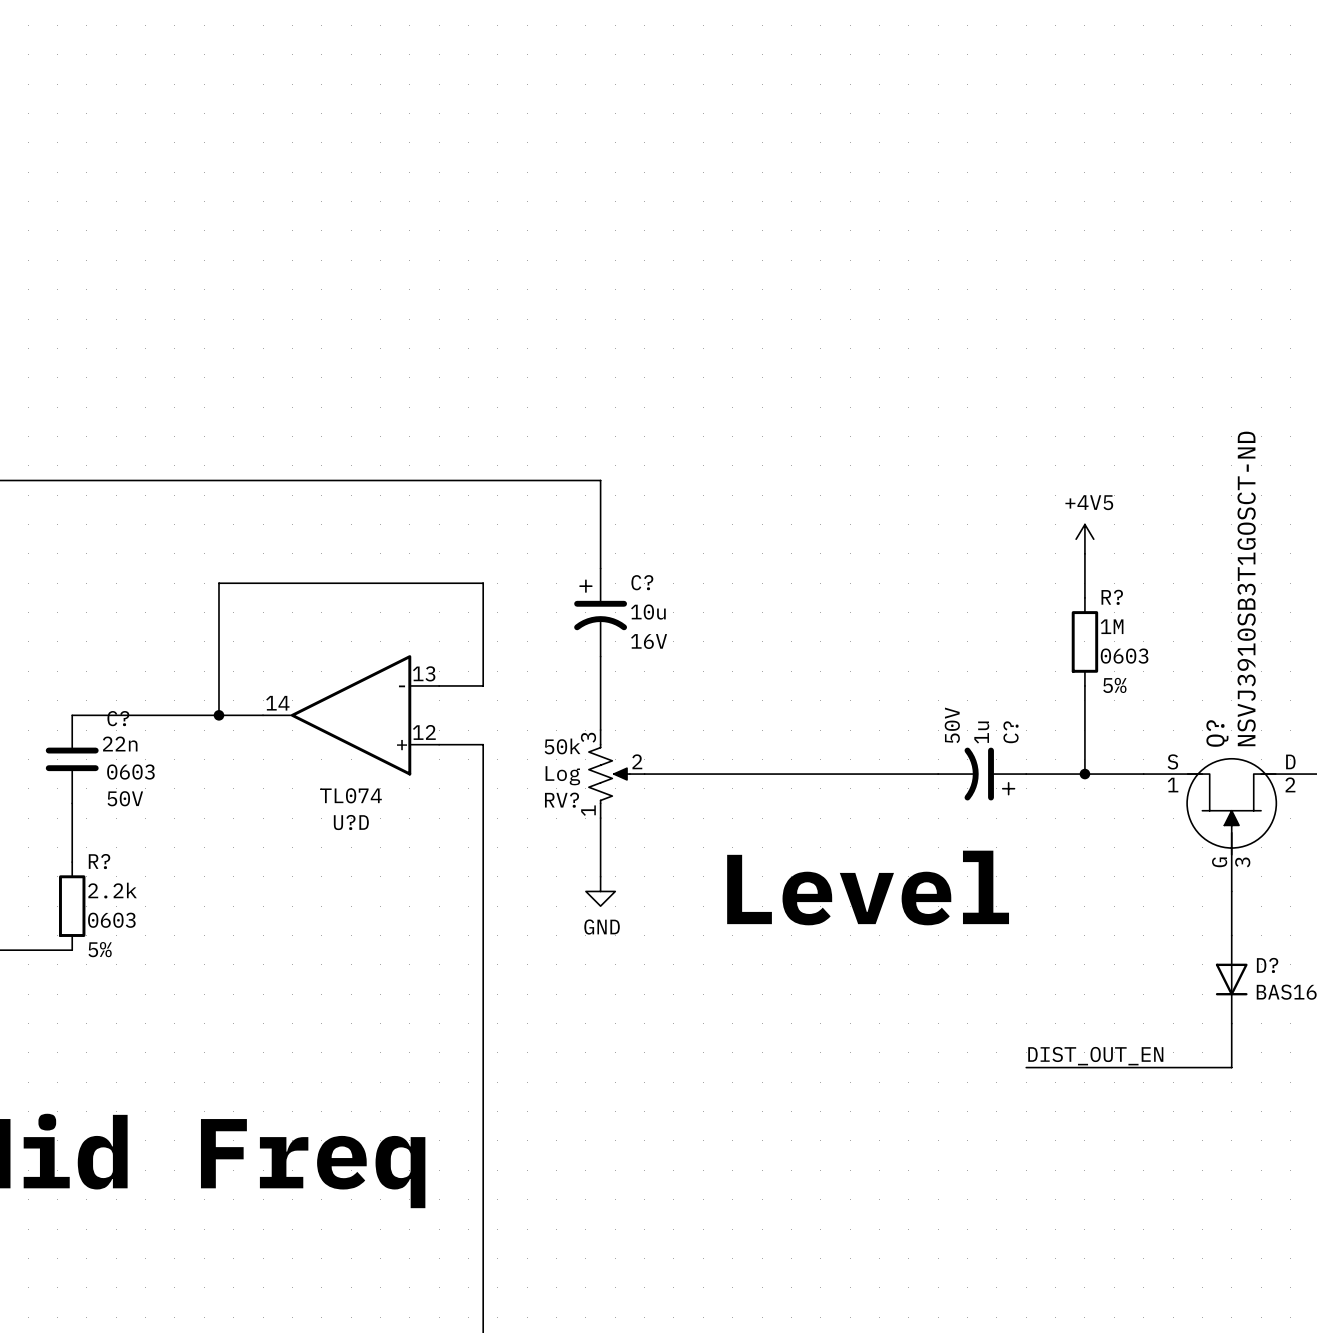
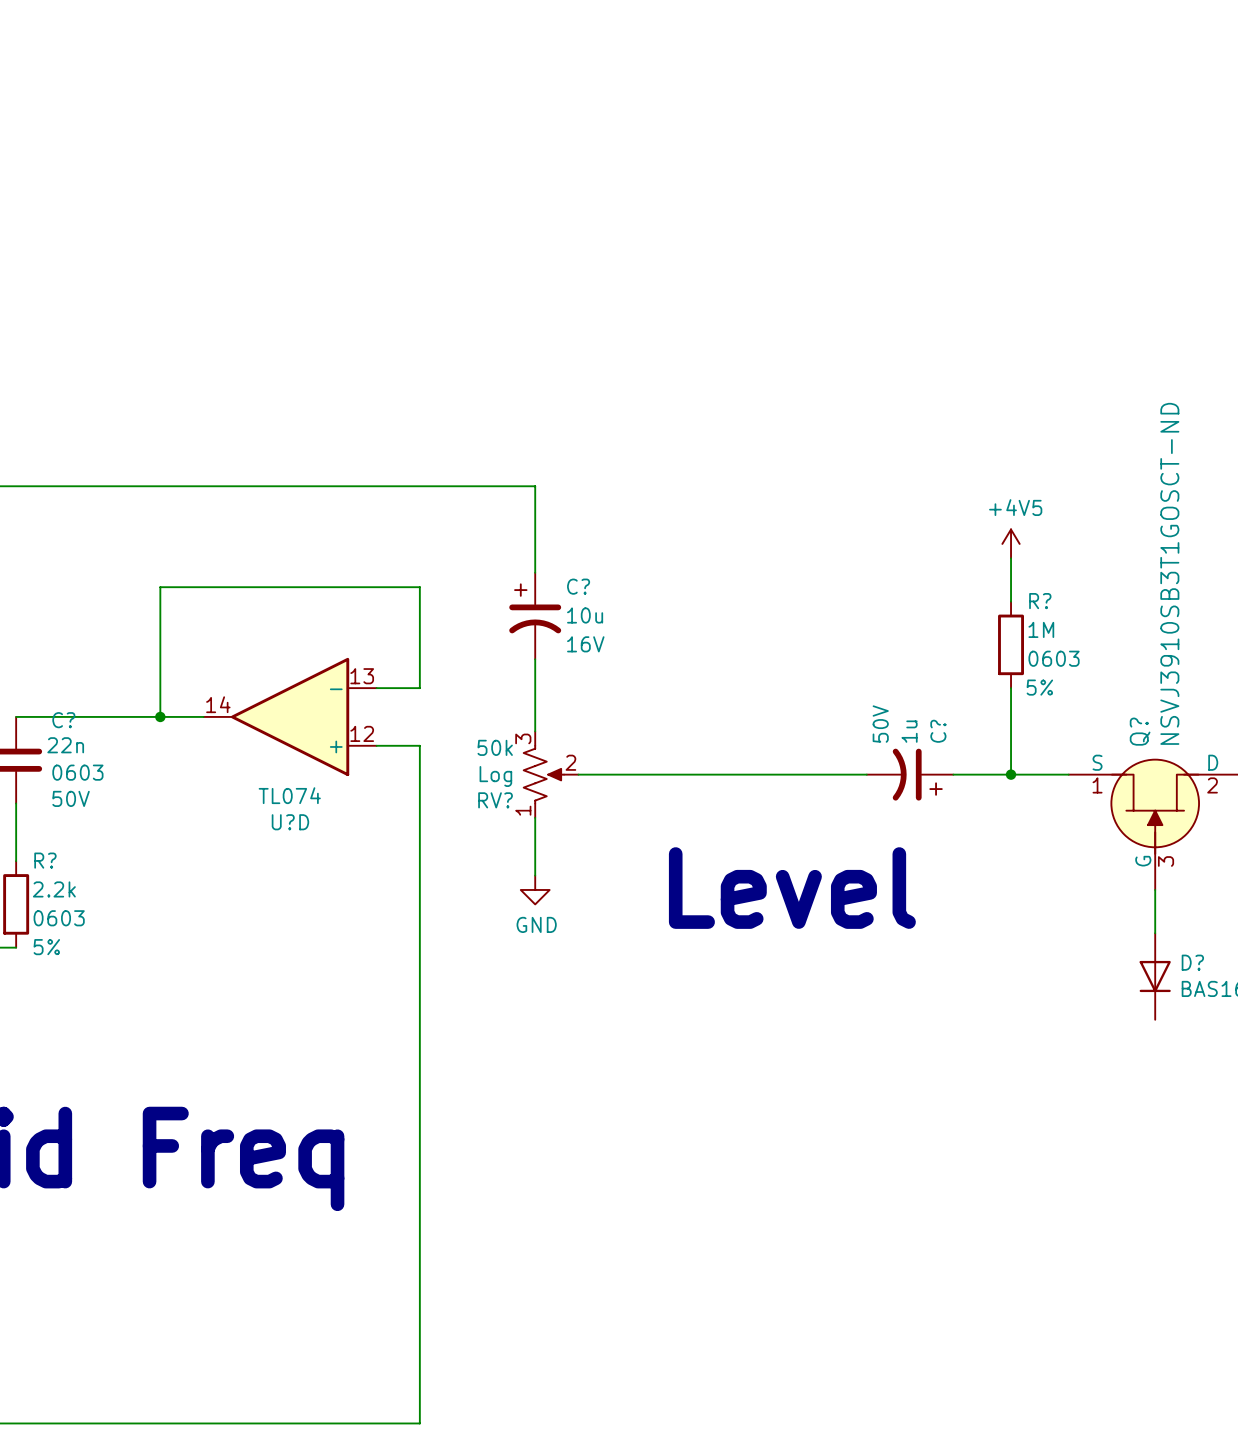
wire: (1231, 1023) (1231, 1067) (1026, 1067) -> none
label: DIST_OUT_EN (1095, 1056) -> none

